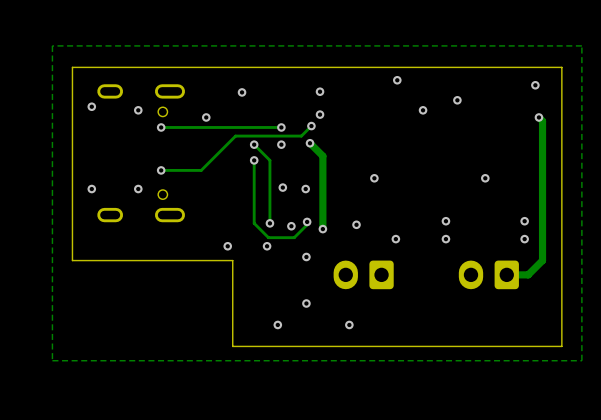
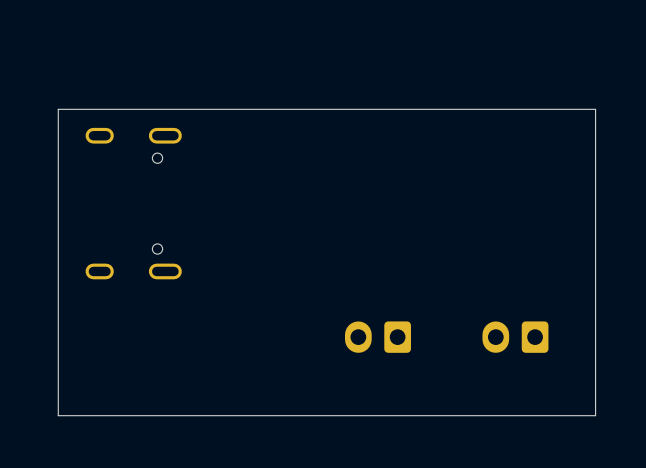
zone outline: (581, 45) (52, 45) (52, 360) (581, 360) (581, 45) -> none
via: (397, 80) -> none
via: (535, 85) -> none
via: (320, 91) -> none
via: (242, 92) -> none
via: (457, 100) -> none
via: (91, 106) -> none
via: (138, 110) -> none
via: (423, 110) -> none
via: (320, 114) -> none
via: (206, 117) -> none
track: (538, 117) (542, 121) (542, 260) (528, 274) (506, 274) -> none
via: (538, 117) -> none
track: (311, 126) (301, 136) (235, 136) (201, 170) (161, 170) -> none
via: (311, 126) -> none
via: (161, 127) -> none
track: (281, 127) (161, 127) -> none
via: (281, 127) -> none
track: (310, 143) (322, 156) (322, 229) -> none
via: (310, 143) -> none
track: (254, 144) (269, 160) (269, 223) -> none
via: (254, 144) -> none
via: (281, 144) -> none
track: (254, 160) (254, 223) (268, 237) (294, 237) (307, 224) (307, 221) -> none
via: (254, 160) -> none
via: (161, 170) -> none
via: (374, 178) -> none
via: (485, 178) -> none
via: (282, 187) -> none
via: (91, 189) -> none
via: (138, 189) -> none
via: (305, 189) -> none
via: (307, 221) -> none
via: (445, 221) -> none
via: (524, 221) -> none
via: (269, 223) -> none
via: (356, 224) -> none
via: (291, 226) -> none
via: (322, 229) -> none
via: (395, 239) -> none
via: (445, 239) -> none
via: (524, 239) -> none
via: (227, 246) -> none
via: (267, 246) -> none
via: (306, 256) -> none
board edge: (72, 260) (232, 260) (232, 346) -> (58, 321) (58, 415) (234, 415)
via: (306, 303) -> none
via: (277, 324) -> none
via: (349, 324) -> none

